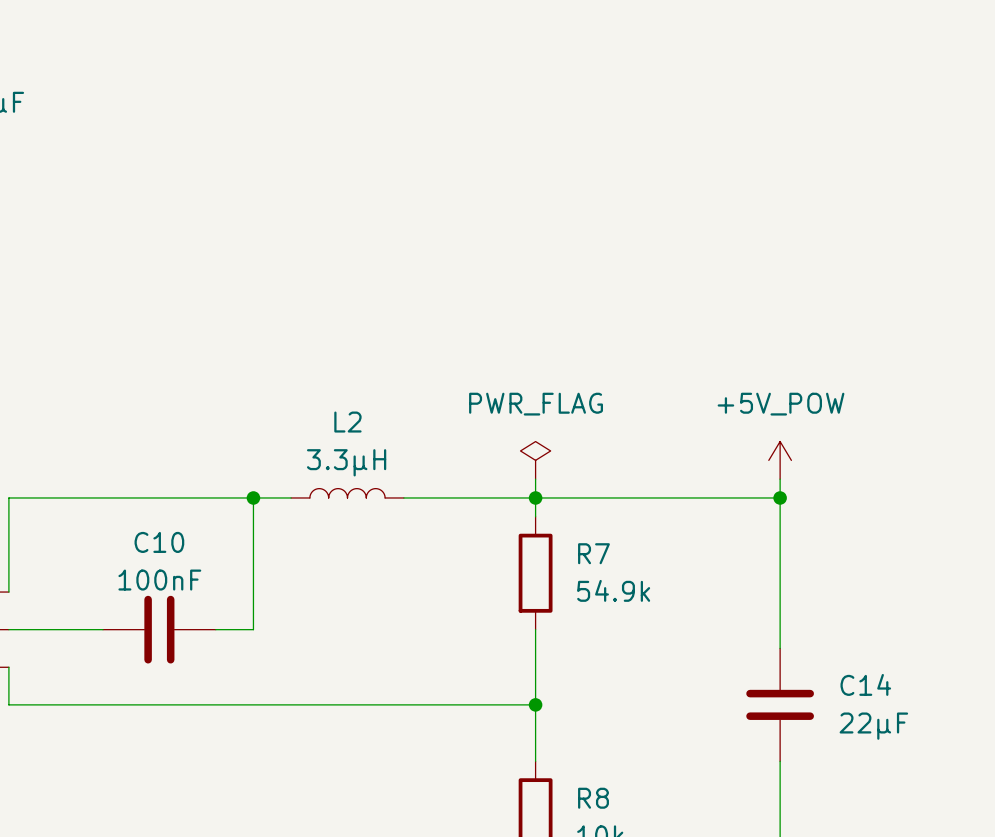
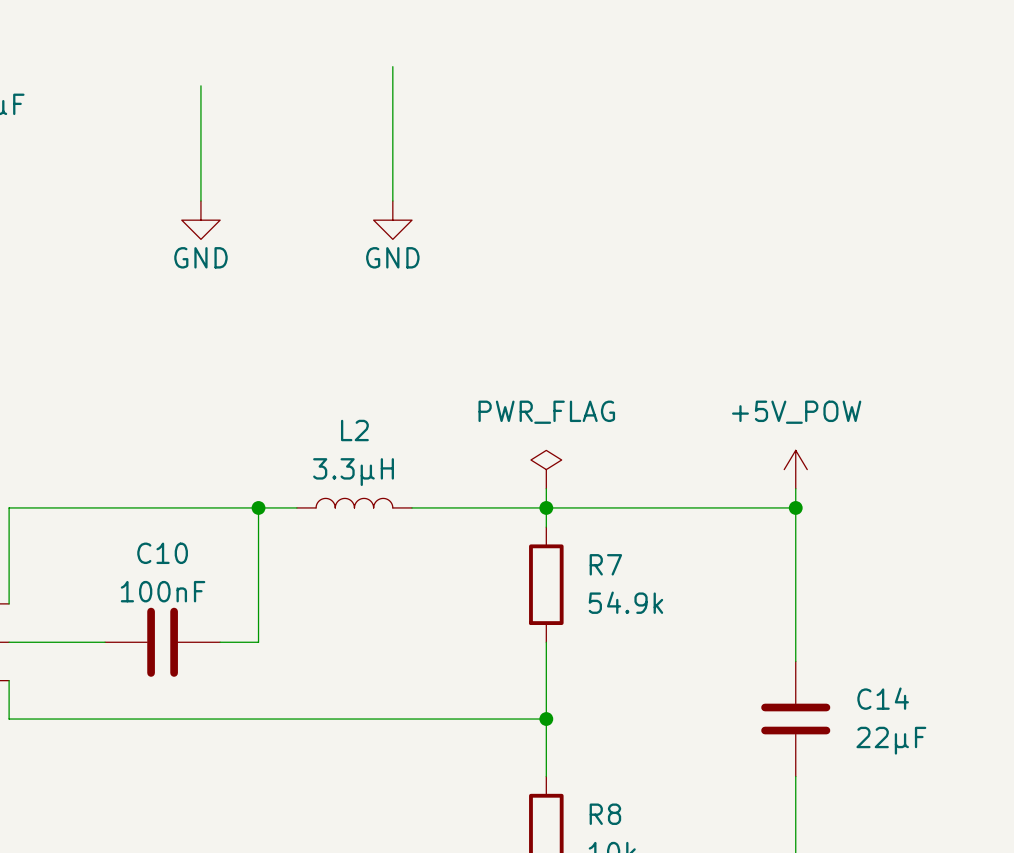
wire: none -> (392, 66) (392, 200)
wire: none -> (200, 85) (200, 200)
power symbol: none -> GND (200, 220)
power symbol: none -> GND (392, 220)

